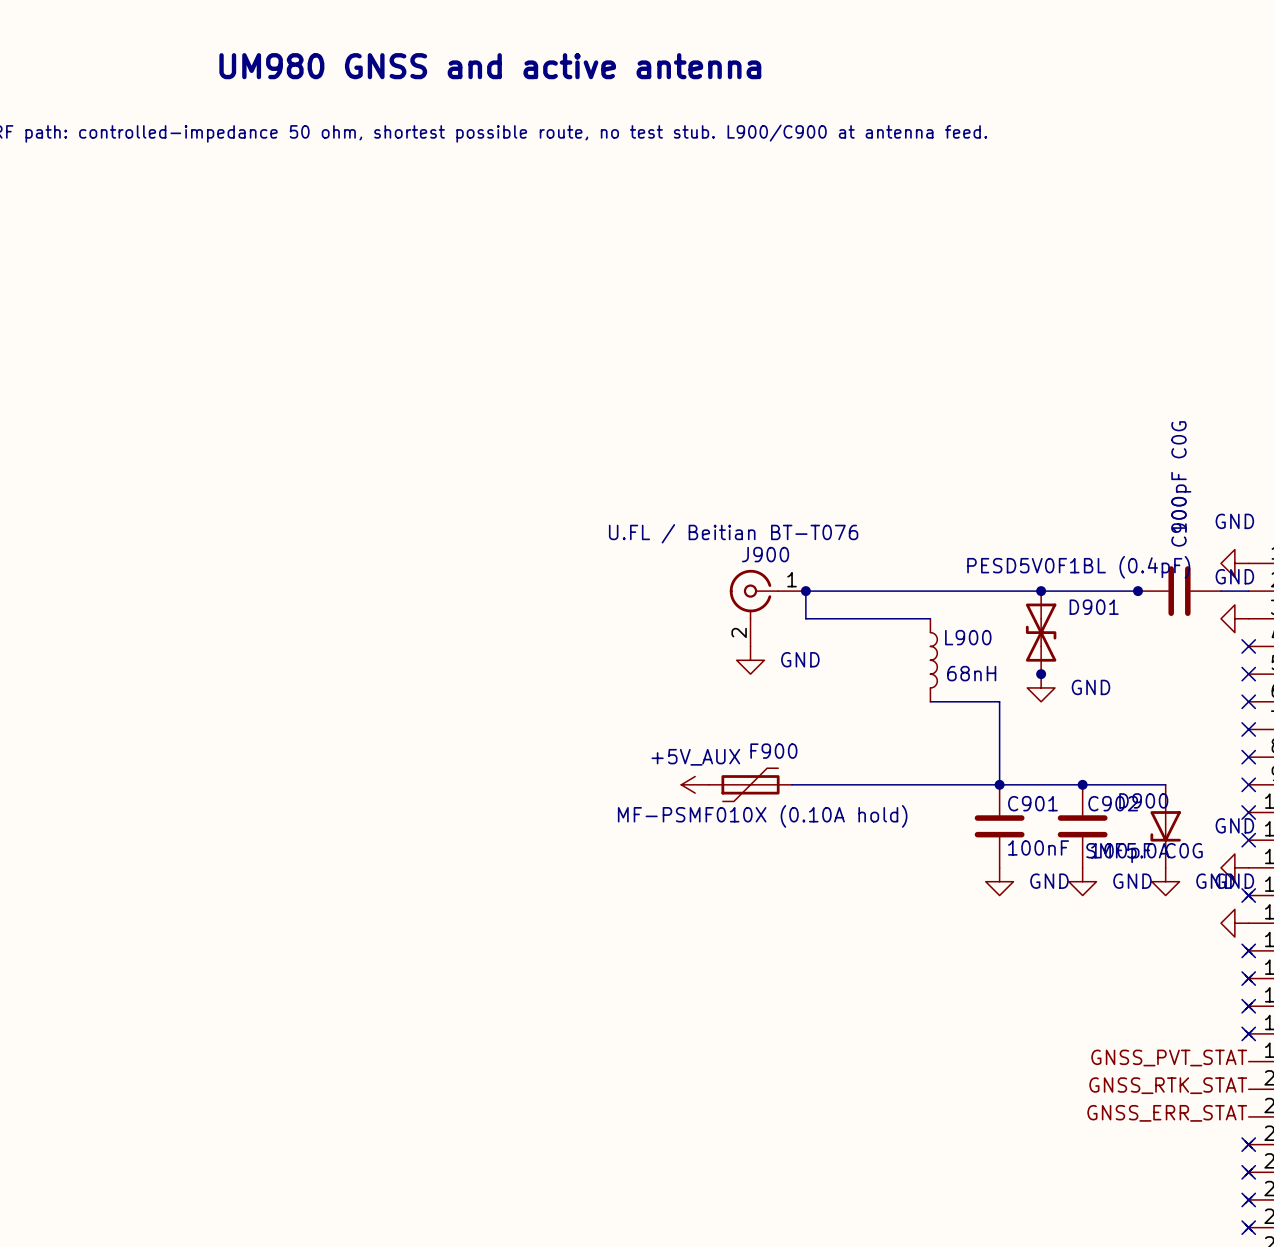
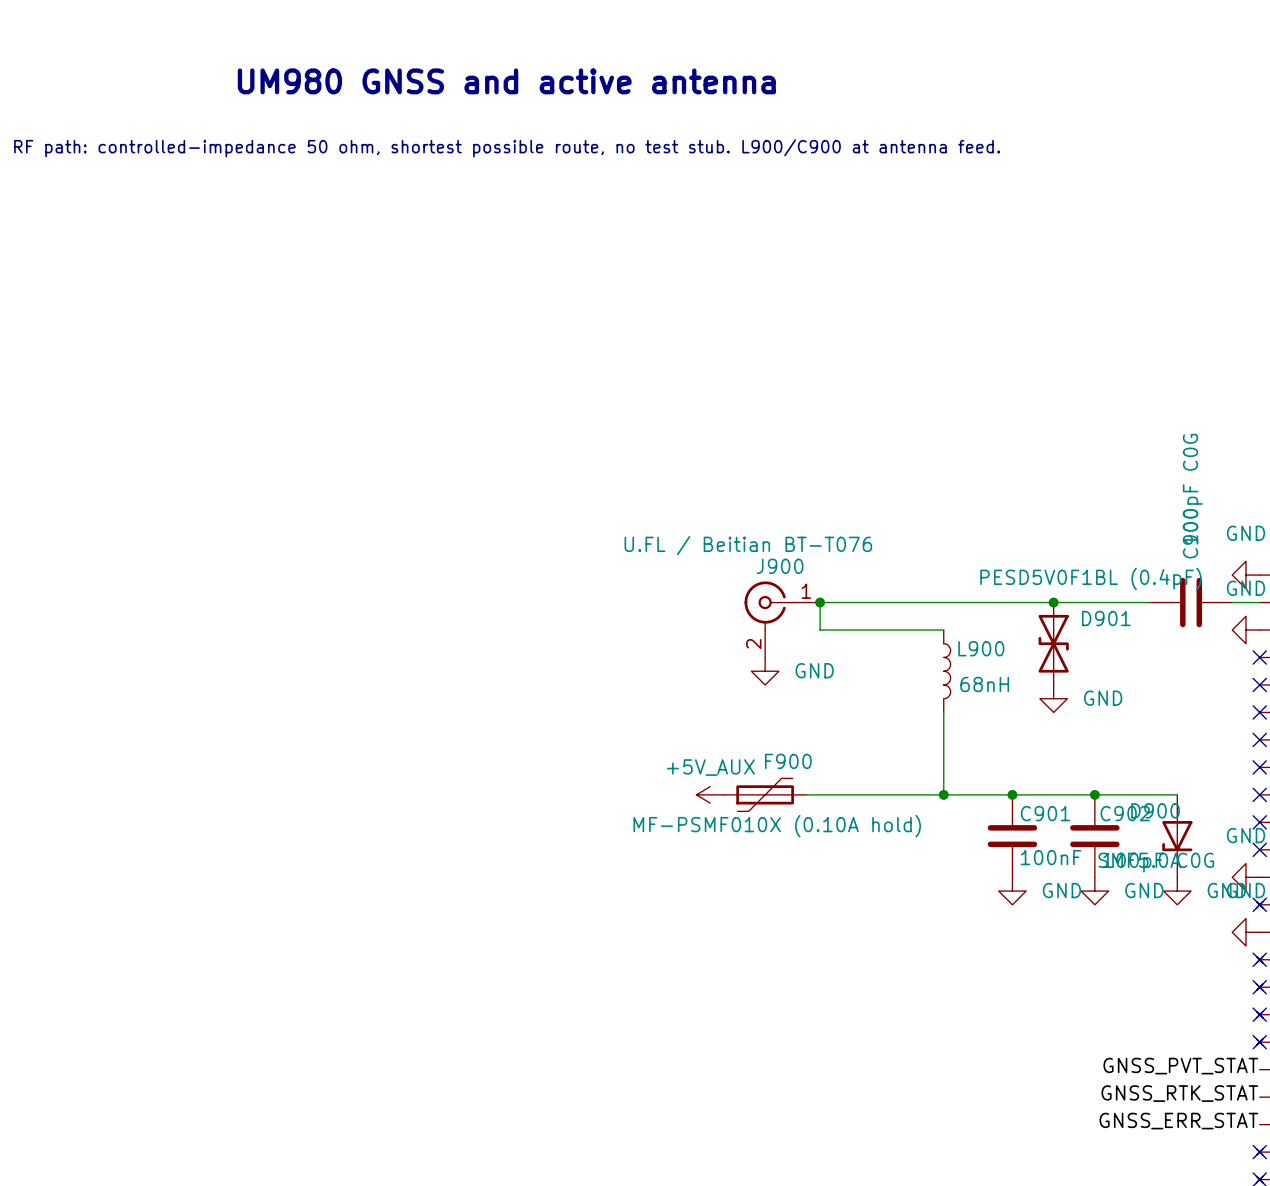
junction: (1137, 591) -> none
junction: (1041, 674) -> none
wire: (930, 701) (999, 701) (999, 784) -> (943, 712) (943, 794)
junction: none -> (943, 794)

